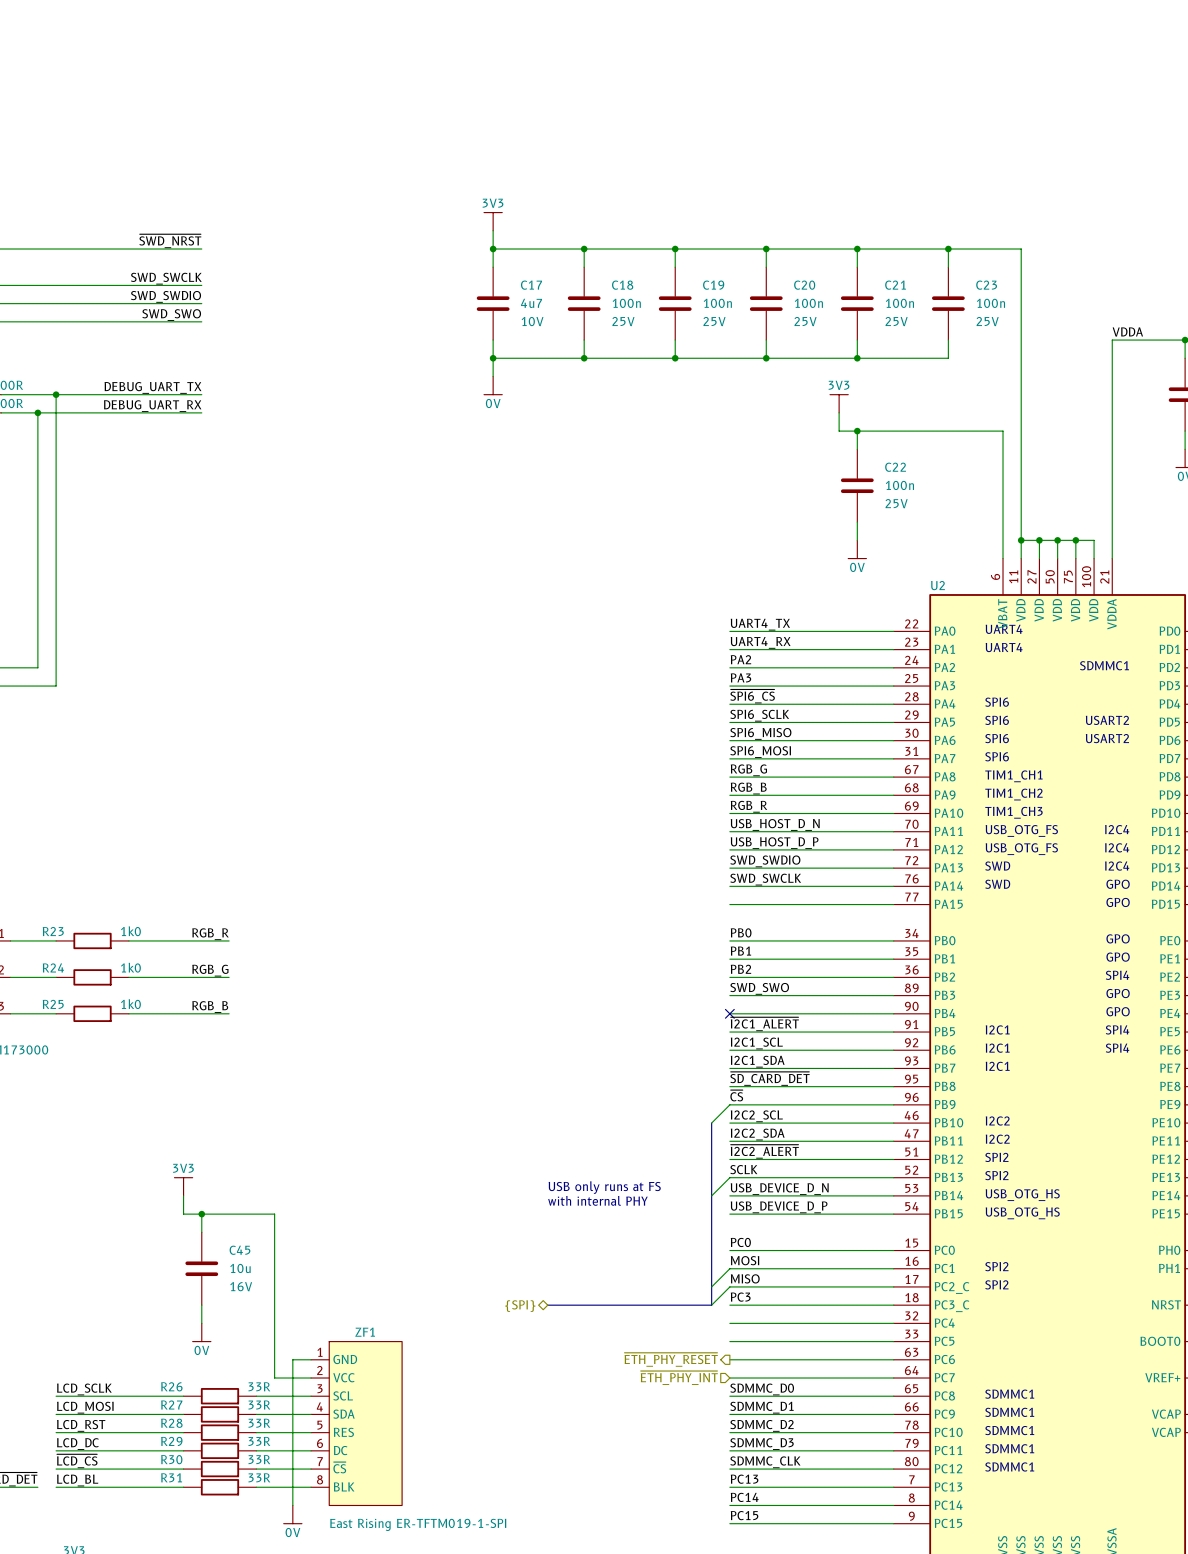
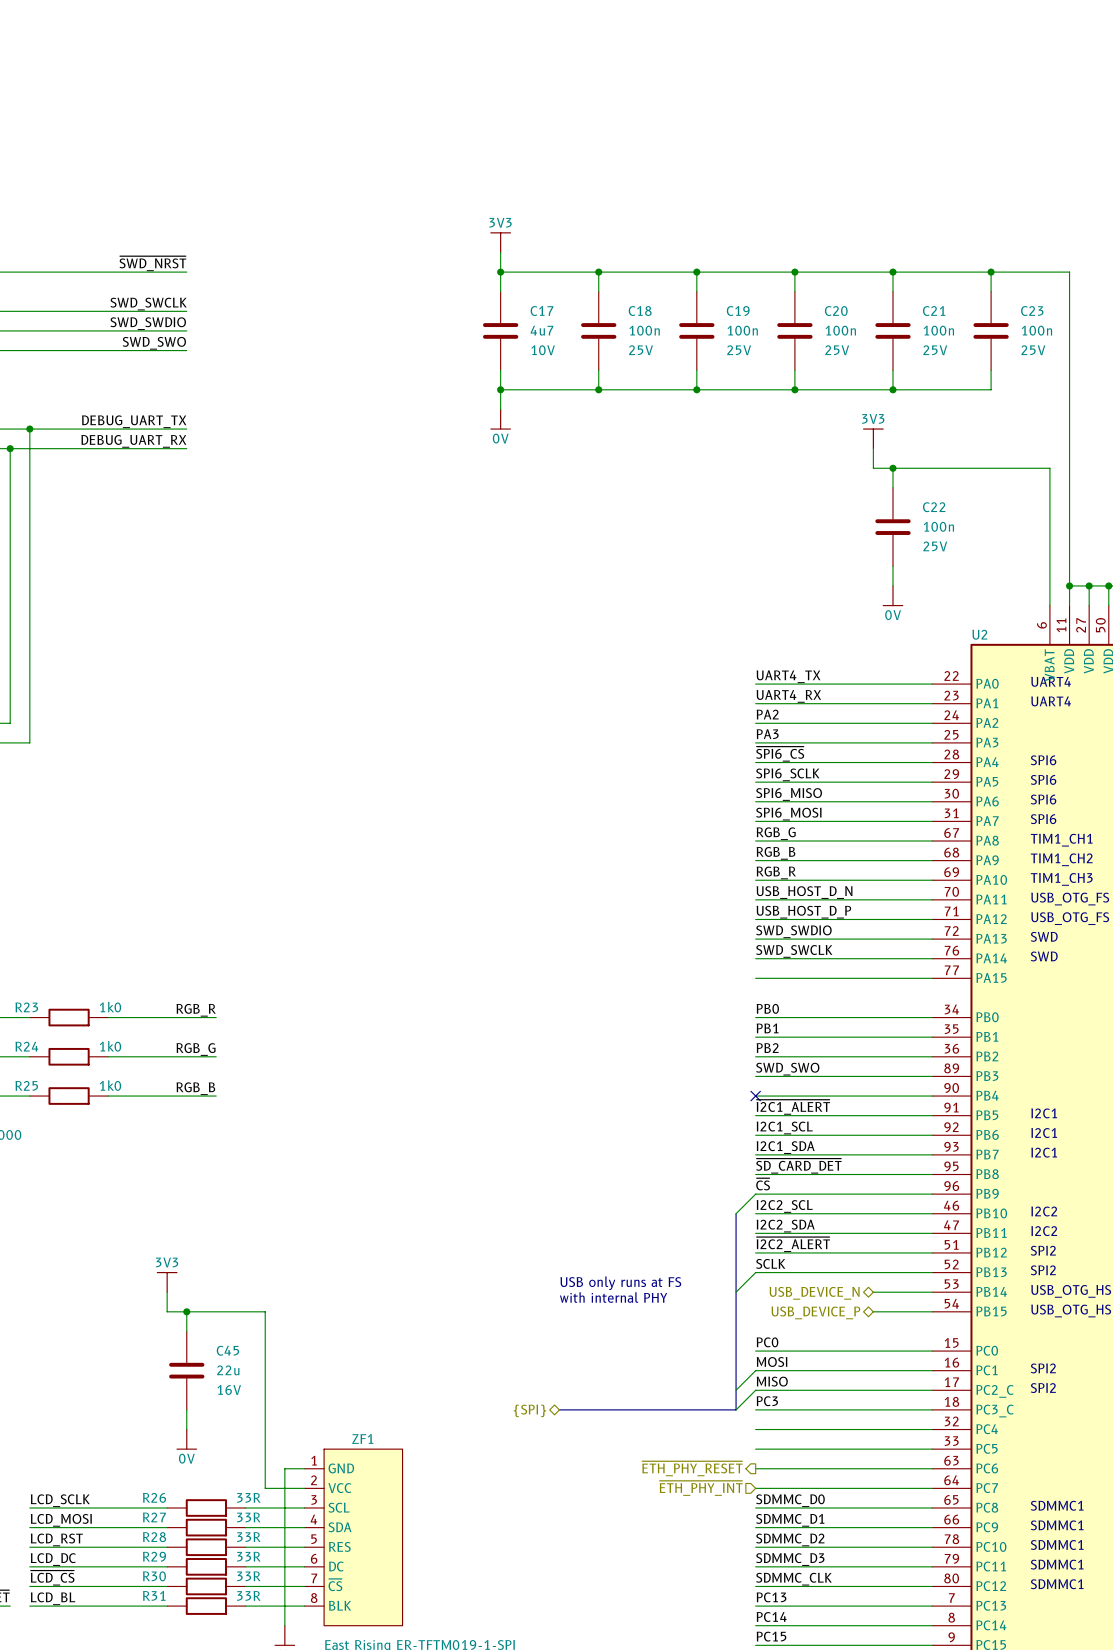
label: USB_DEVICE_D_N (779, 1189) -> none
wire: (729, 1195) (839, 1195) -> none
hierarchical label: none -> USB_DEVICE_N (814, 1293)
label: USB_DEVICE_D_P (779, 1207) -> none
wire: (729, 1214) (839, 1214) -> none
hierarchical label: none -> USB_DEVICE_P (815, 1312)
C45 value: 10u (240, 1268) -> 22u (228, 1370)

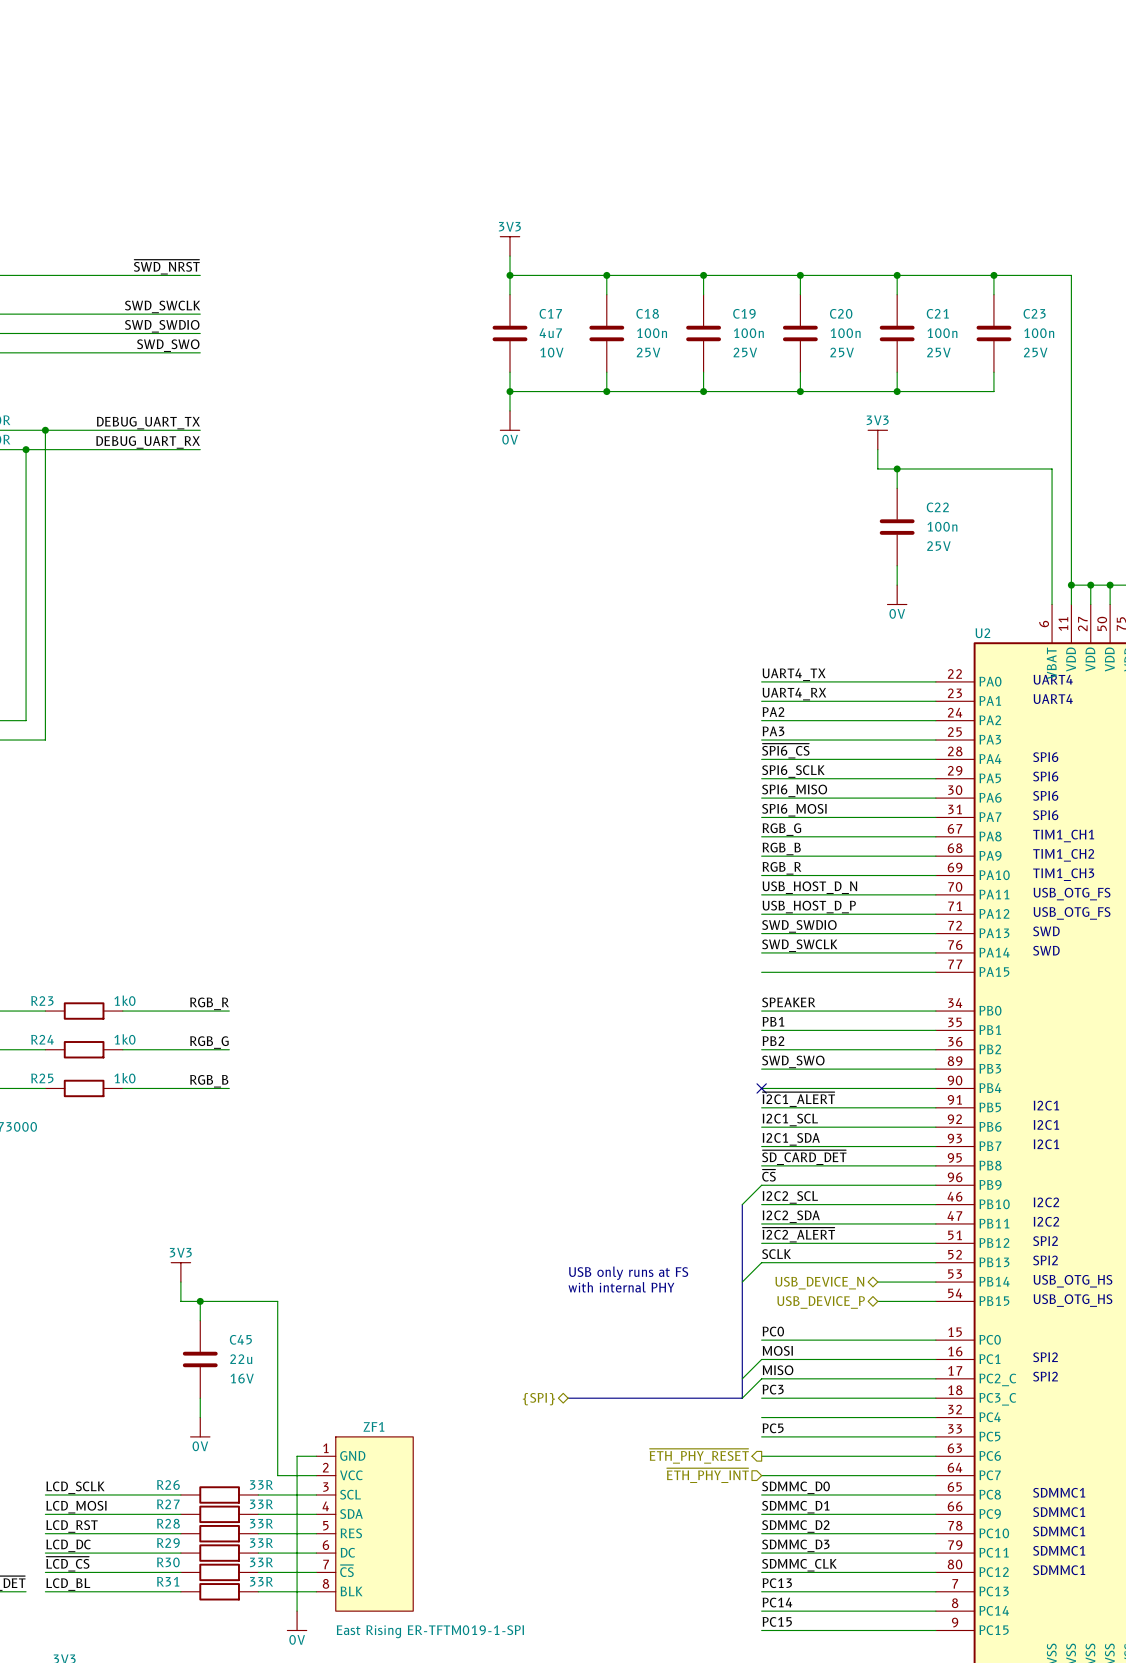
label: PB0 (767, 1008) -> SPEAKER (788, 1002)
label: none -> PC5 (773, 1428)

